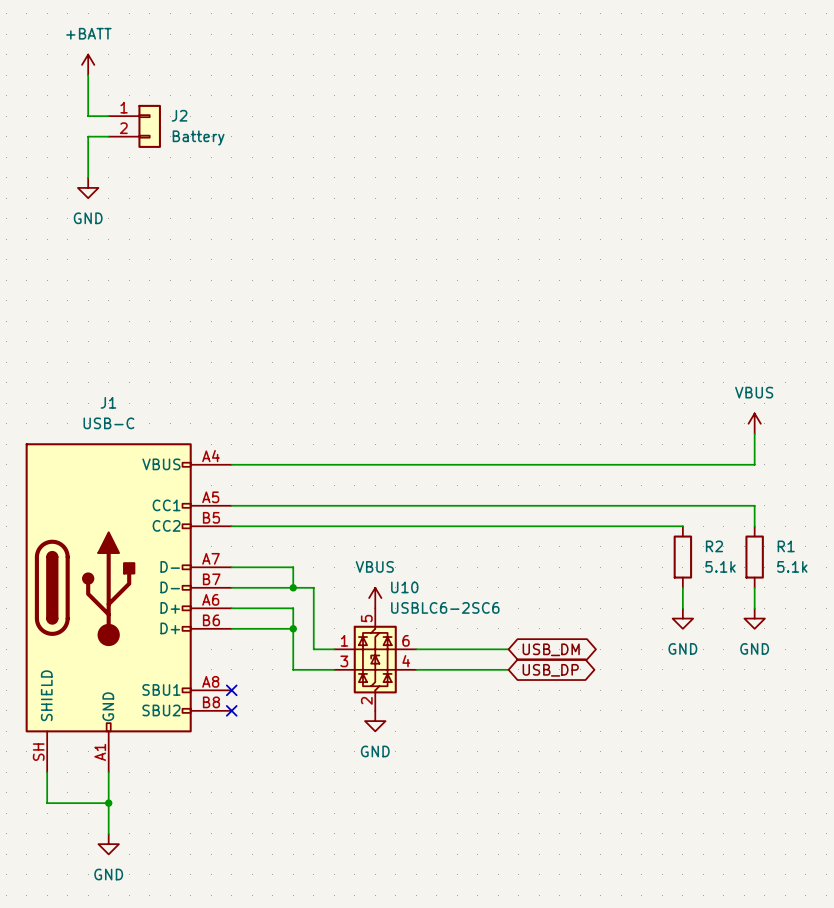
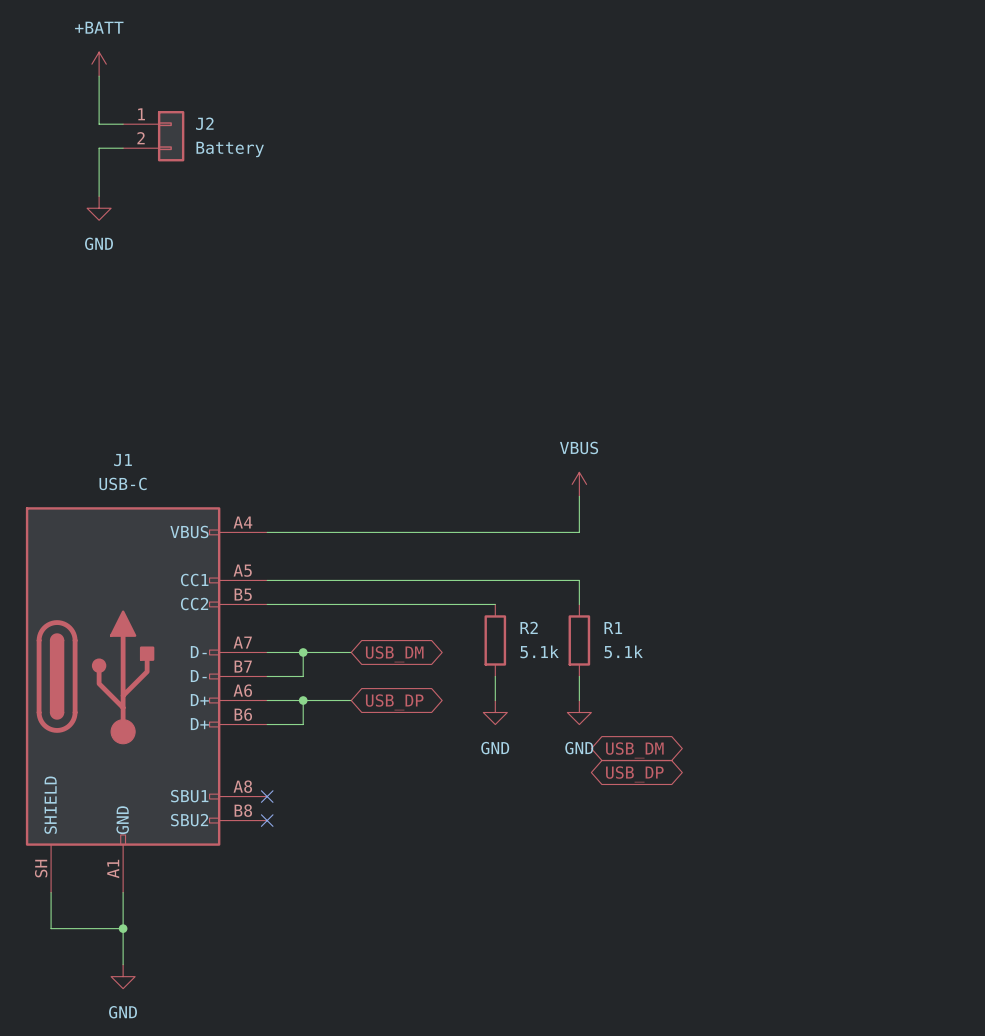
power symbol: none -> VBUS (579, 484)
power symbol: VBUS (754, 423) -> none
wire: (754, 434) (754, 464) (498, 464) -> (579, 496) (579, 532)
wire: (498, 505) (754, 505) (754, 526) -> (579, 580) (579, 604)
wire: (426, 526) (682, 526) -> none
R2 position: (682, 557) -> (495, 640)
R1 position: (754, 557) -> (579, 640)
junction: none -> (303, 652)
wire: (293, 567) (293, 587) -> (339, 652) (351, 652)
global label: none -> USB_DM (394, 654)
wire: (262, 587) (313, 587) (313, 649) (334, 649) -> (303, 676) (303, 652)
junction: (293, 587) -> none
wire: none -> (495, 676) (495, 700)
wire: (682, 587) (682, 608) -> (579, 676) (579, 700)
wire: (754, 587) (754, 608) -> none
power symbol: VBUS (375, 598) -> none
junction: none -> (303, 700)
wire: (293, 608) (293, 669) (334, 669) -> (339, 700) (351, 700)
global label: none -> USB_DP (394, 702)
power symbol: none -> GND (495, 712)
power symbol: none -> GND (579, 712)
power symbol: GND (682, 618) -> none
power symbol: GND (754, 618) -> none
wire: (262, 628) (293, 628) -> (303, 724) (303, 700)
junction: (293, 628) -> none
wire: (416, 649) (508, 649) -> none
U10: USBLC6-2SC6 (375, 659) -> none
wire: (416, 669) (508, 669) -> none
power symbol: GND (375, 721) -> none

